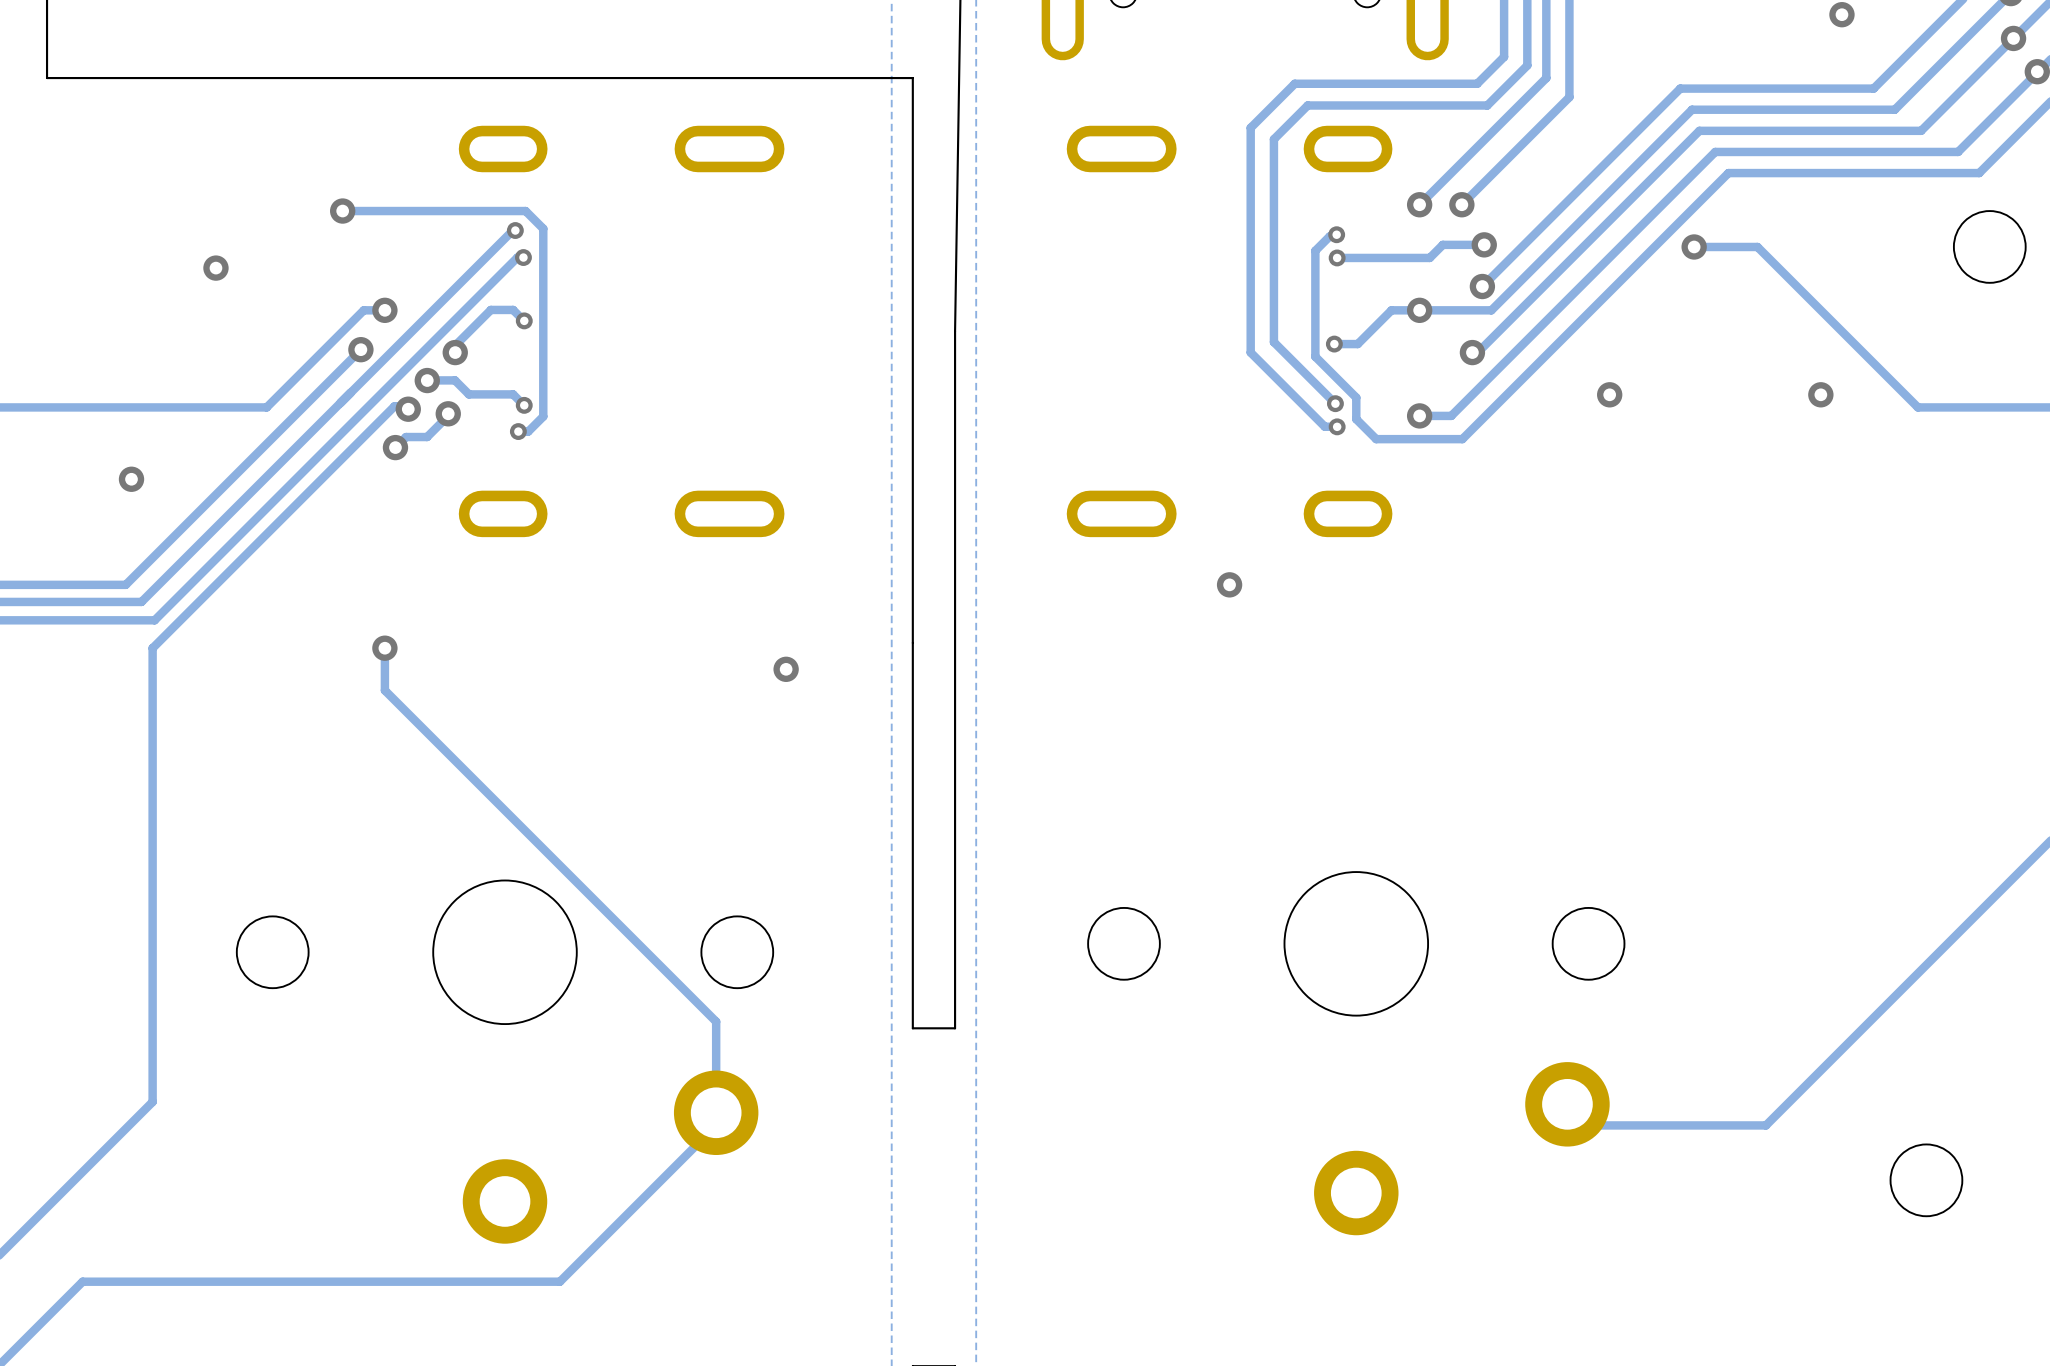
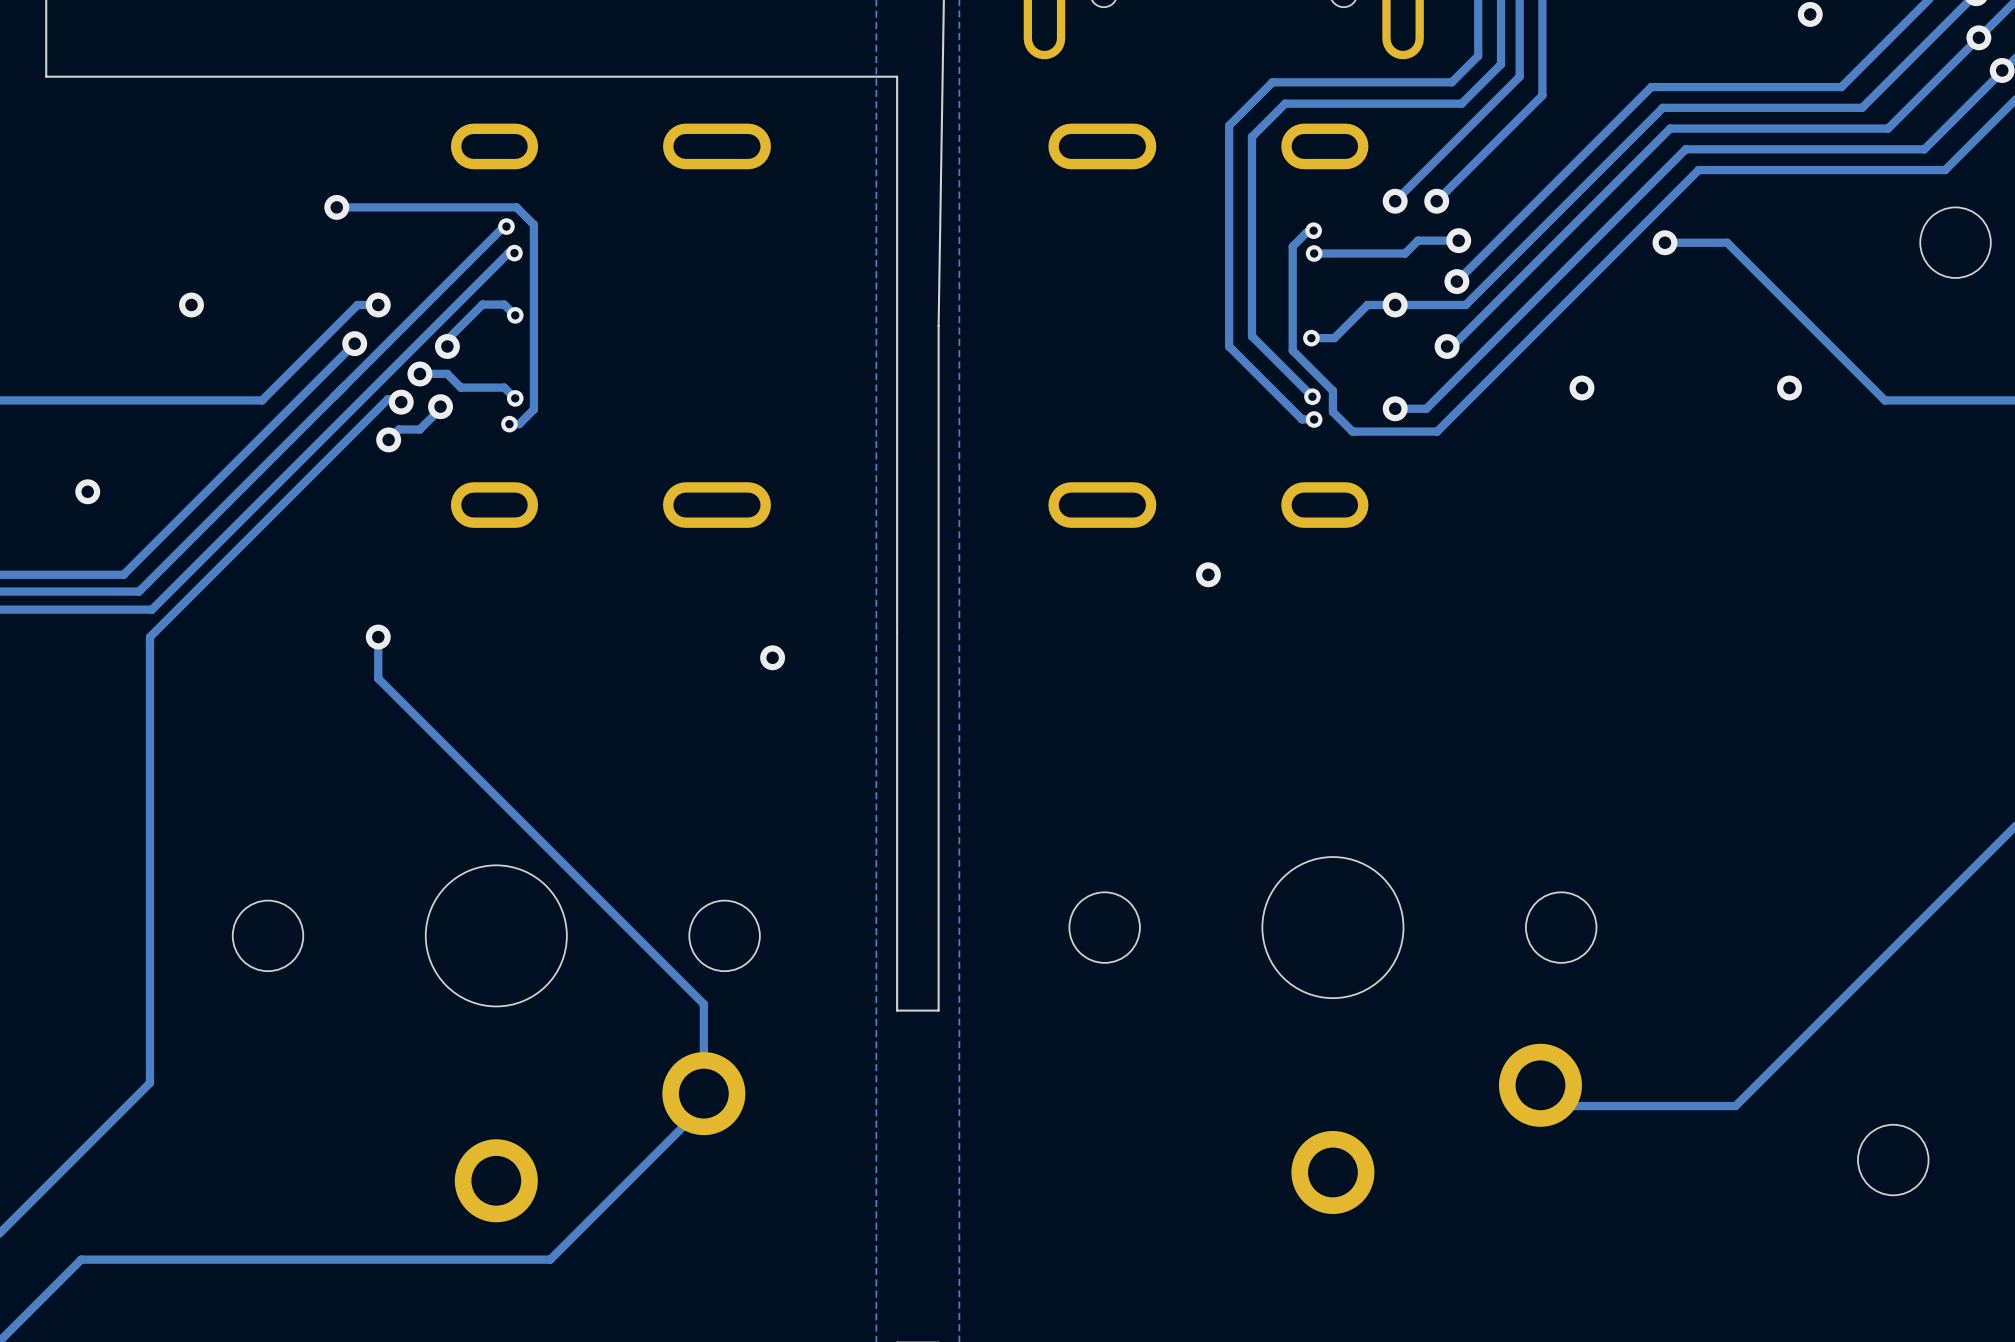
via position: (215, 268) -> (191, 304)
via position: (131, 479) -> (87, 491)

